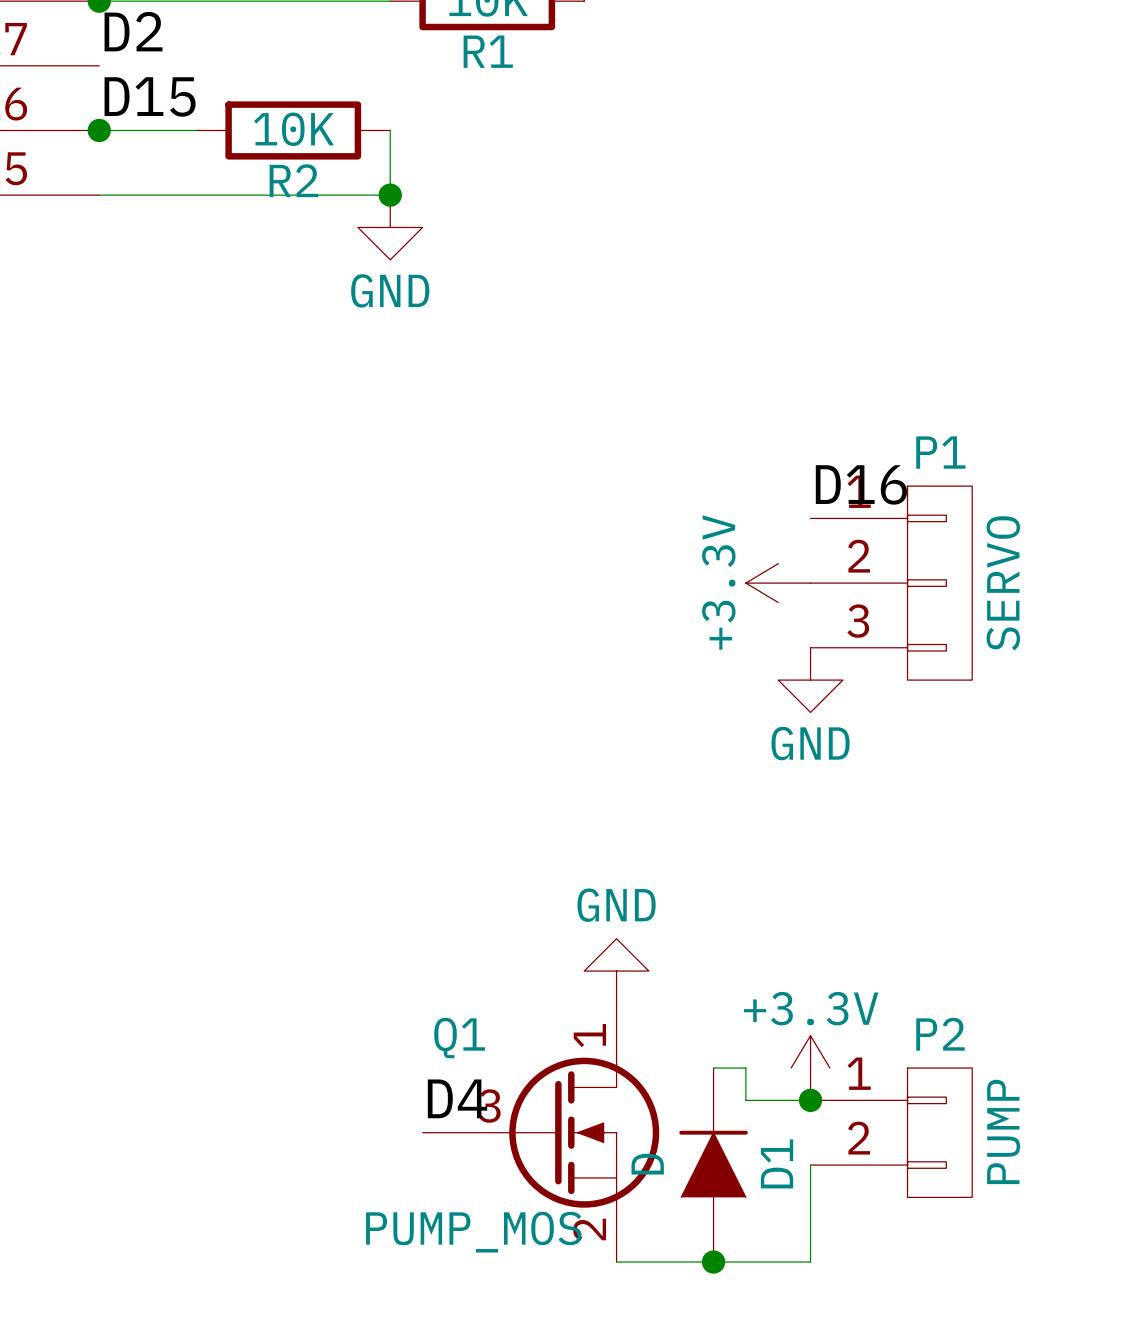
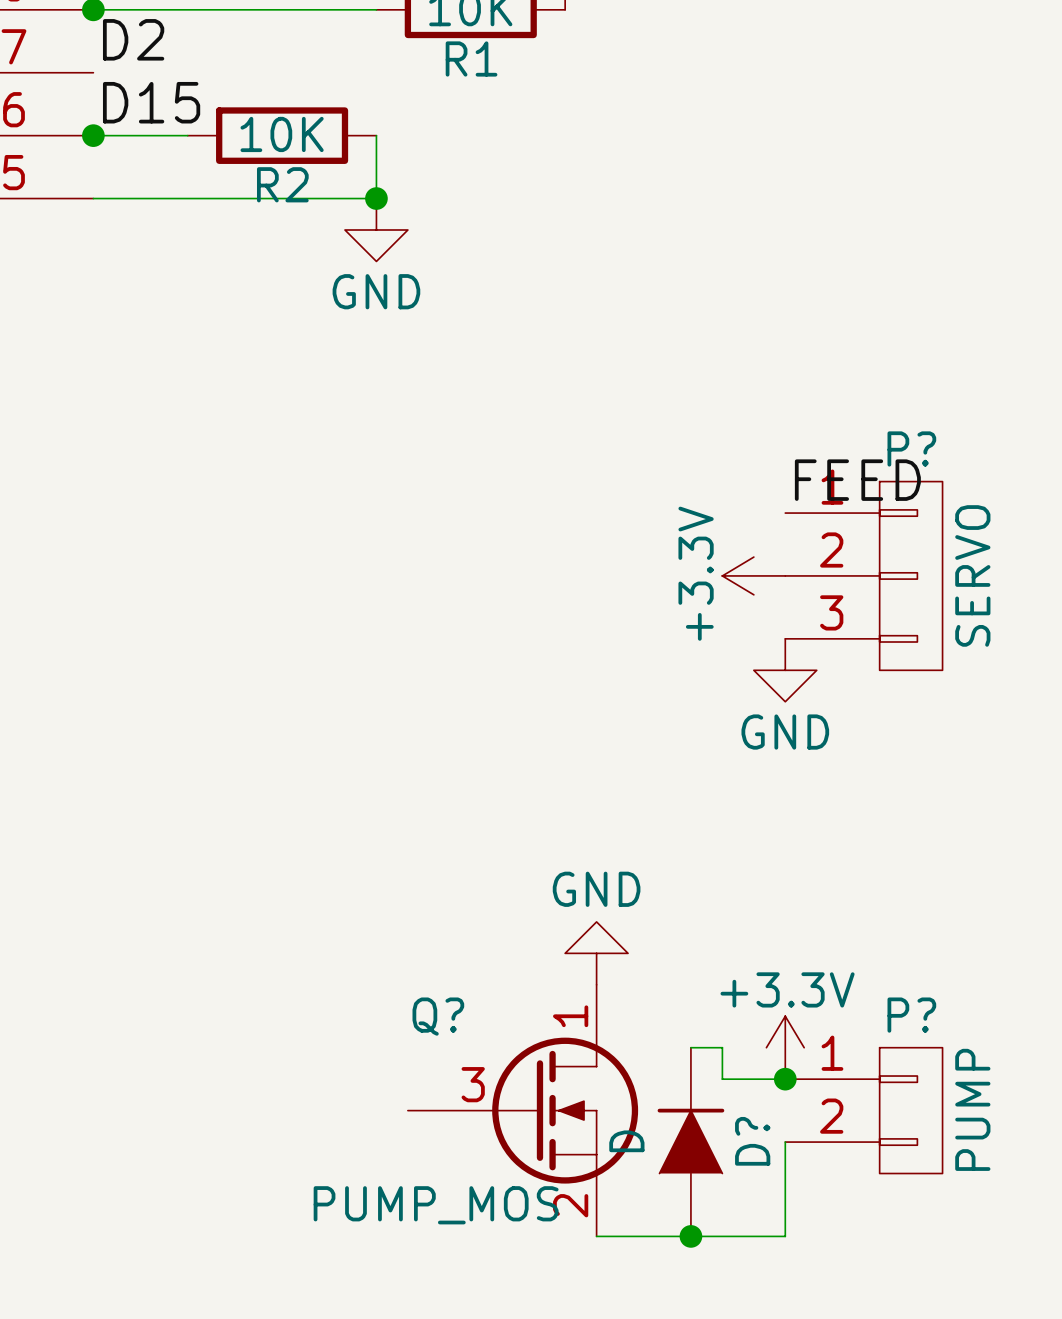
P1 name: P1 (940, 452) -> P? (911, 448)
label: D16 (861, 484) -> FEED (857, 480)
P2 name: P2 (940, 1034) -> P? (911, 1015)
Q1 name: Q1 (459, 1038) -> Q? (438, 1016)
label: D4 (457, 1098) -> none
D1 name: D1 (777, 1163) -> D? (752, 1141)

